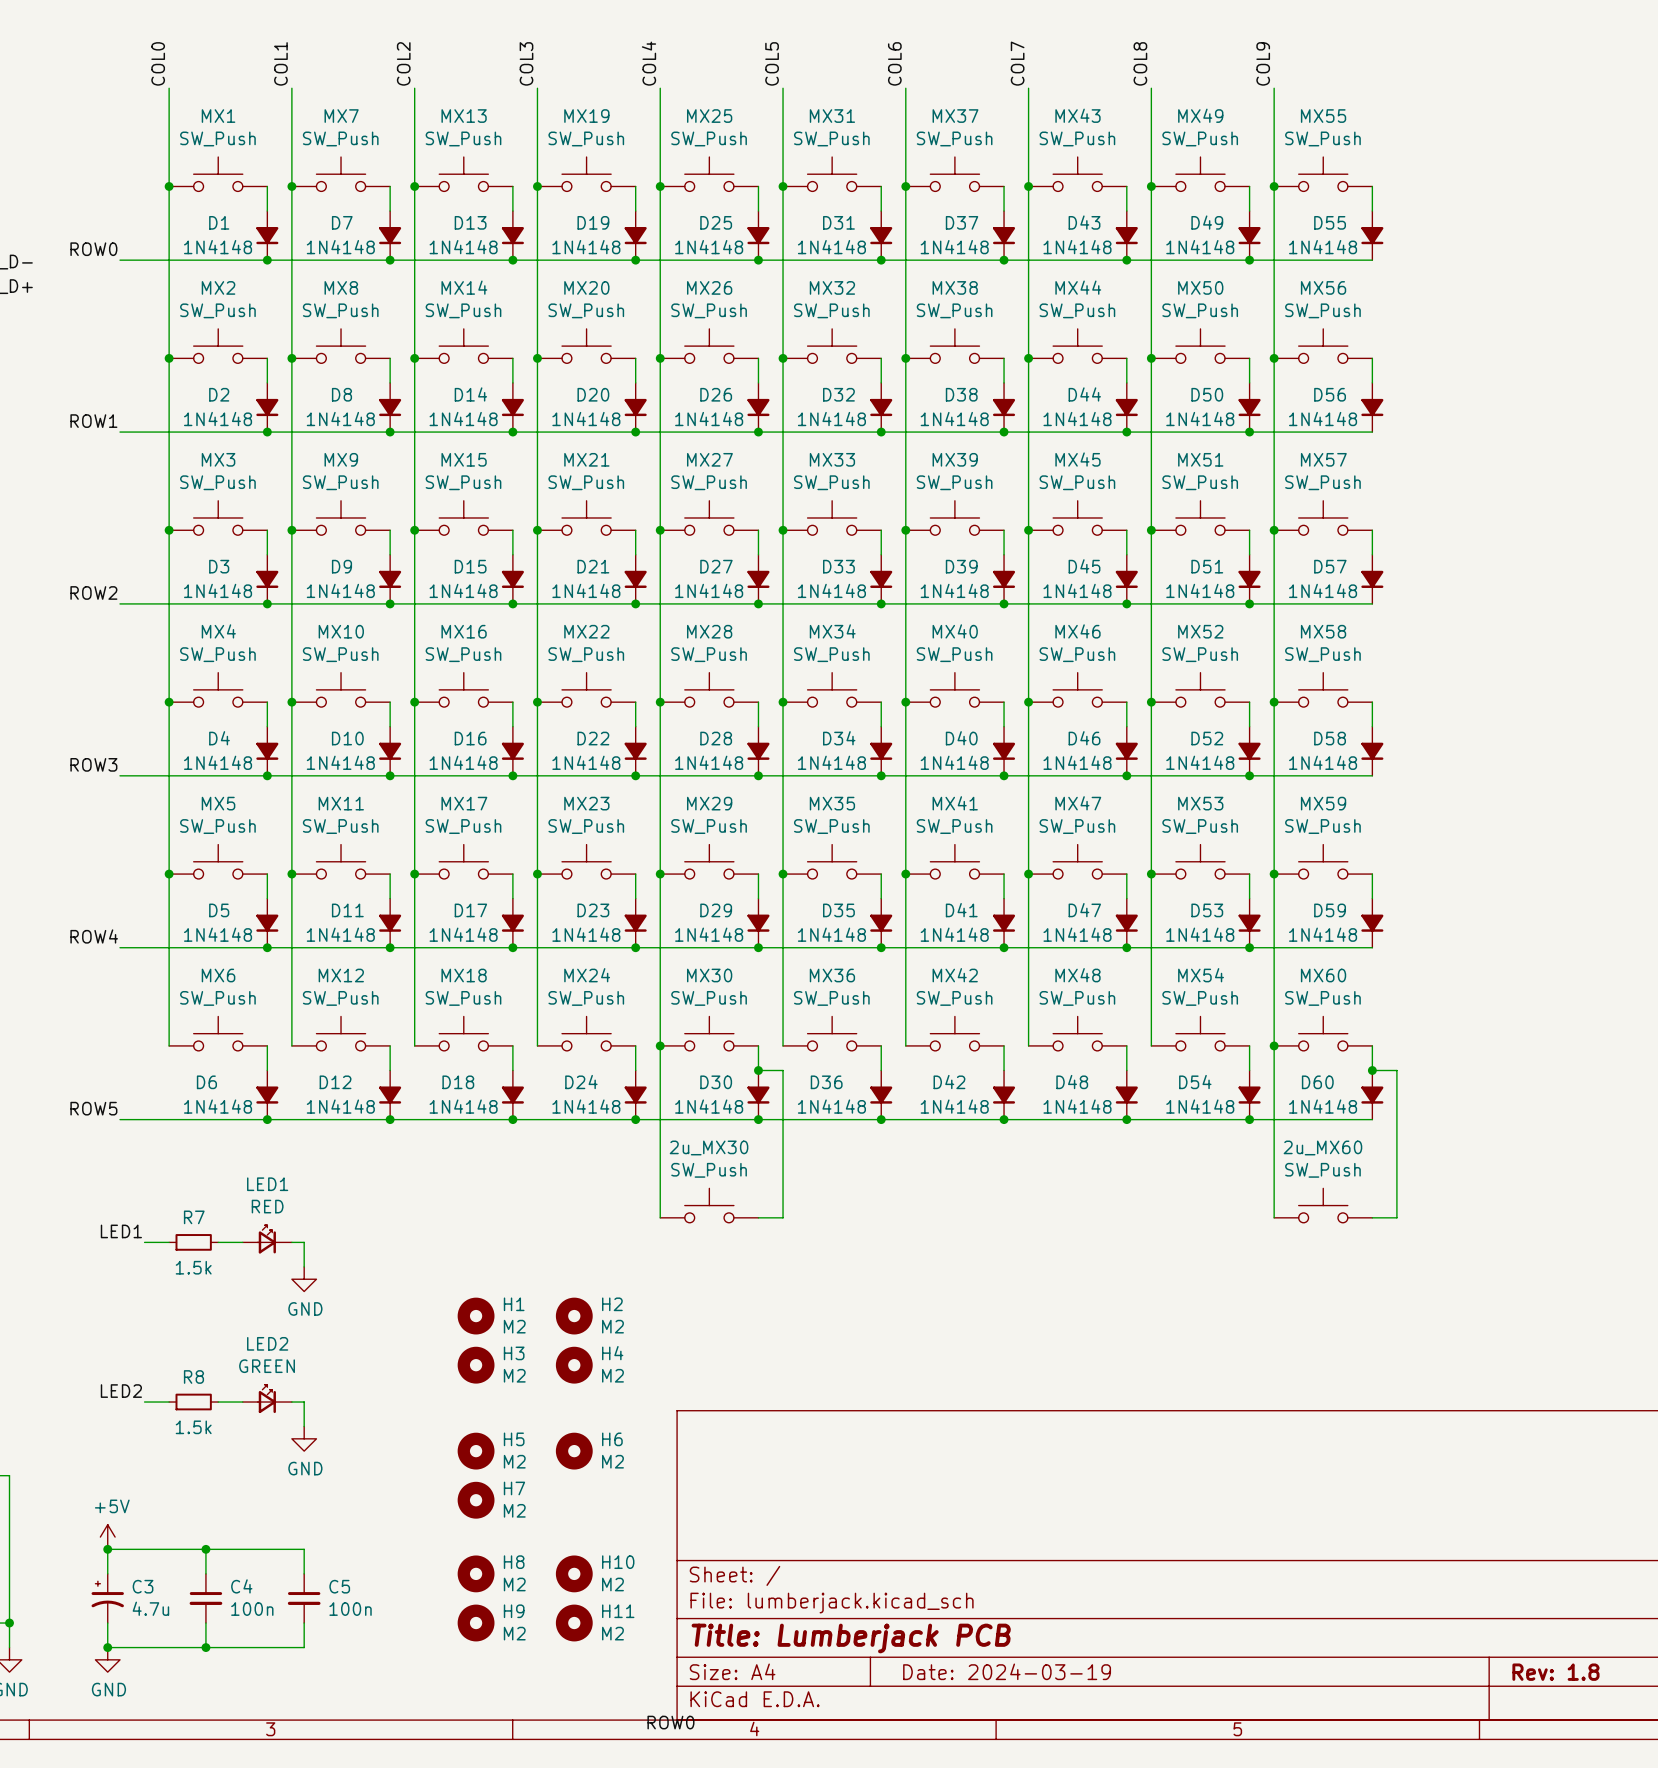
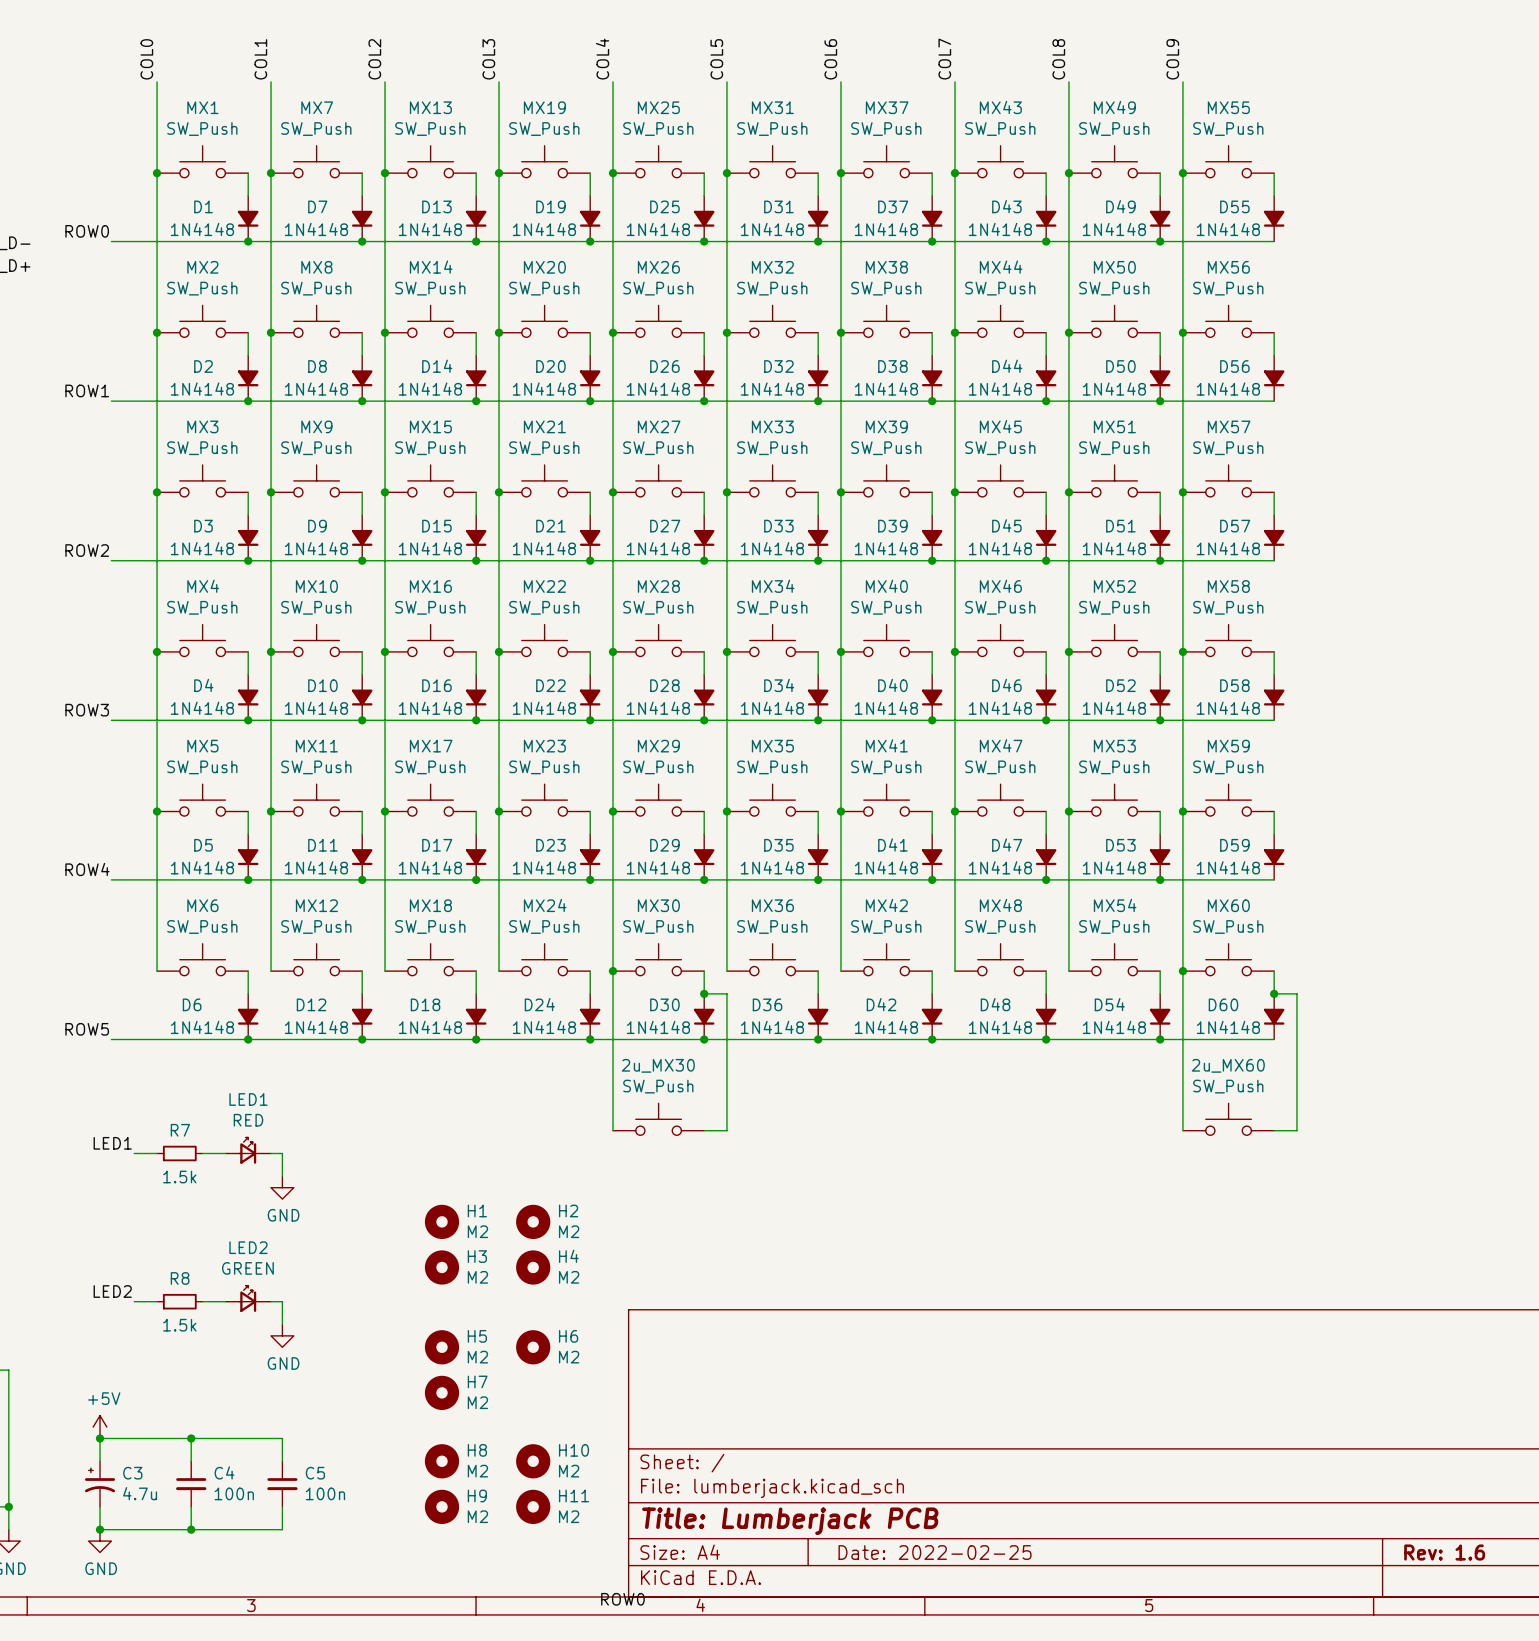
title block: Date: 2024-03-19 (1007, 1671) -> Date: 2022-02-25 (935, 1552)
title block: Rev: 1.8 (1555, 1672) -> Rev: 1.6 (1444, 1552)

